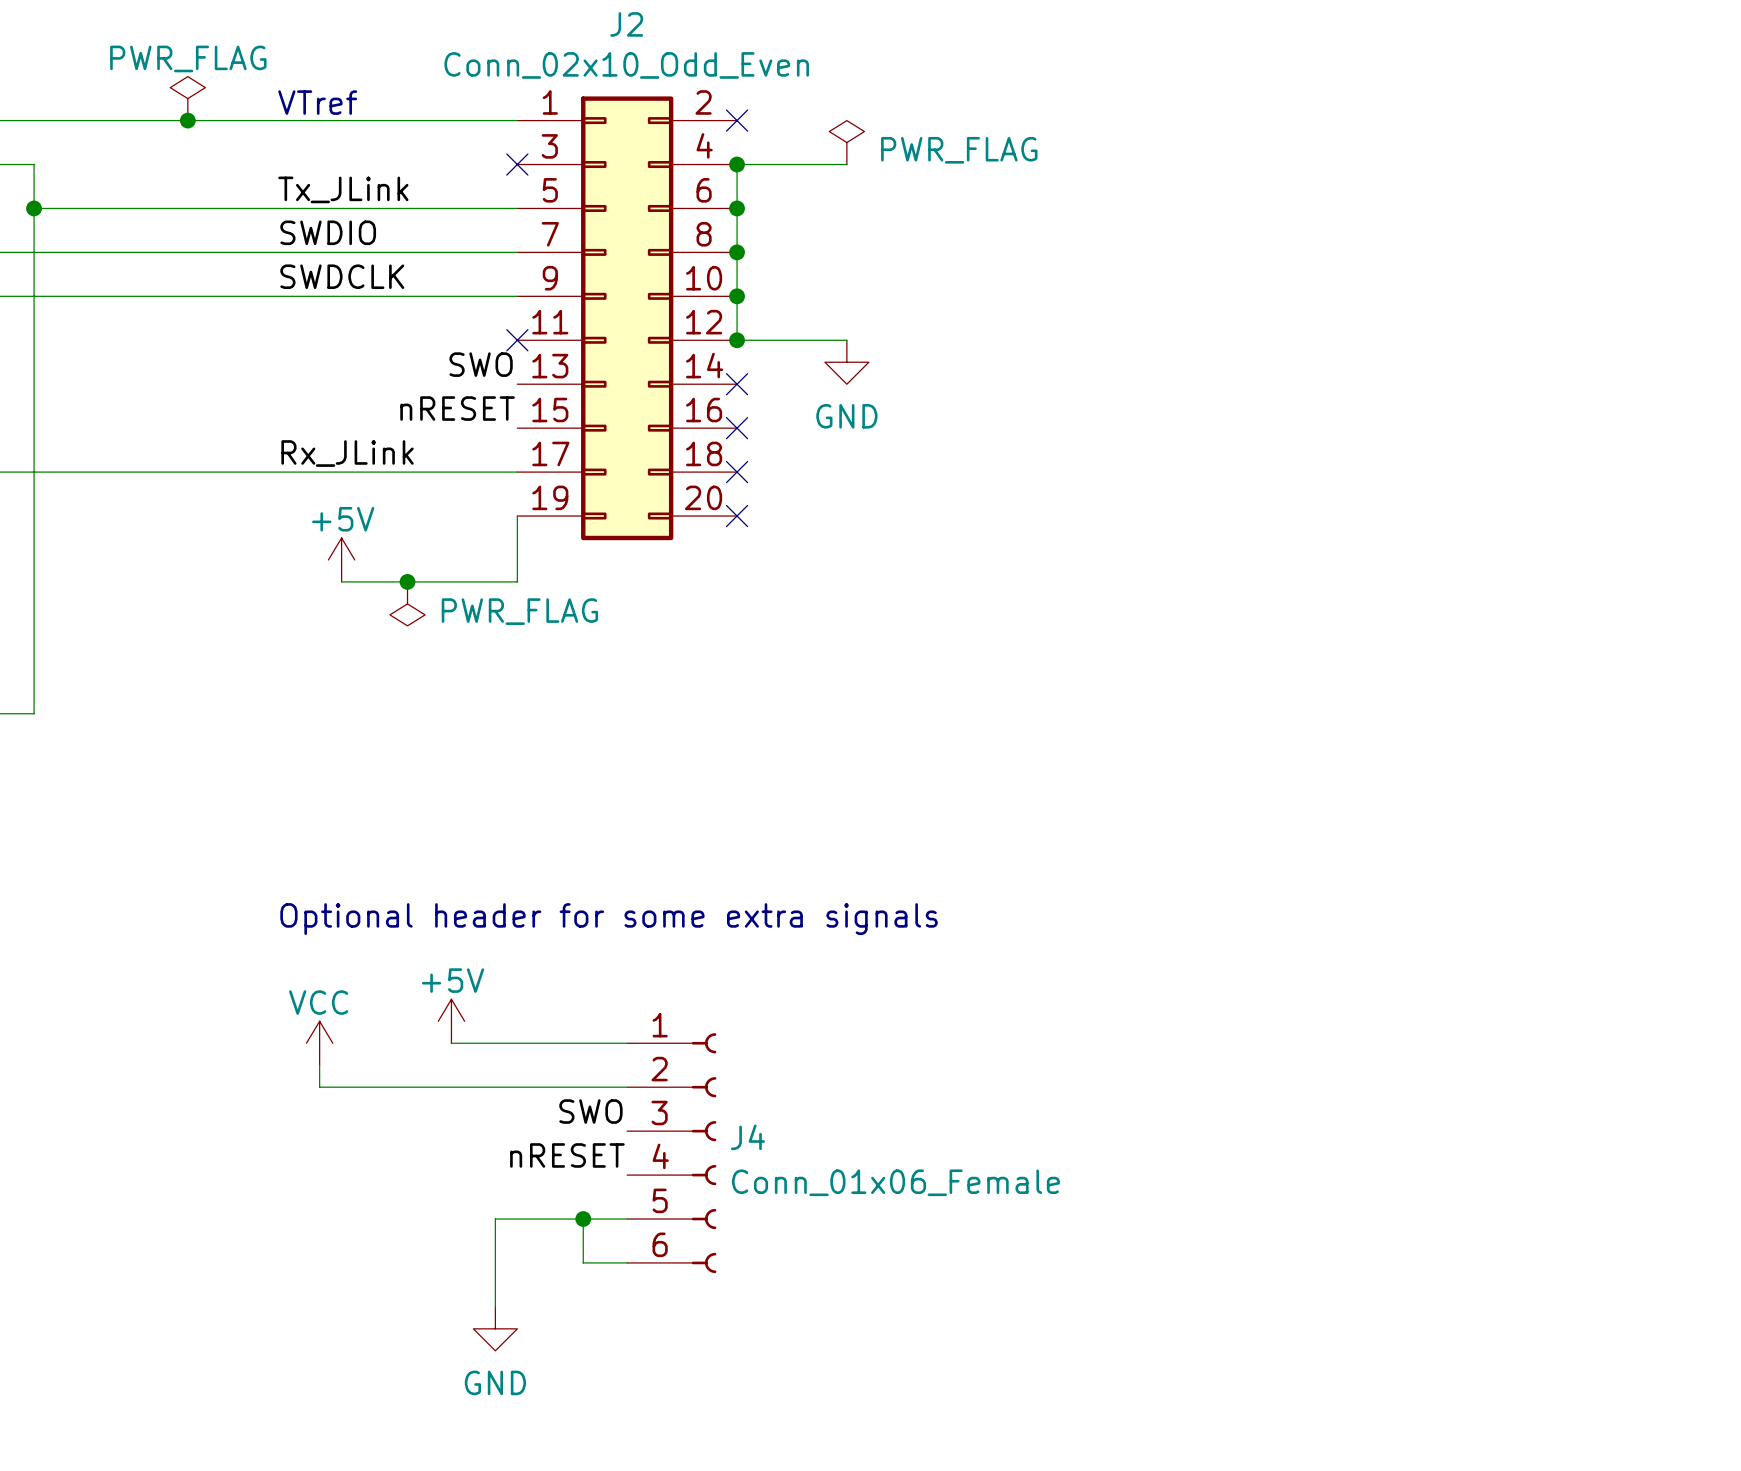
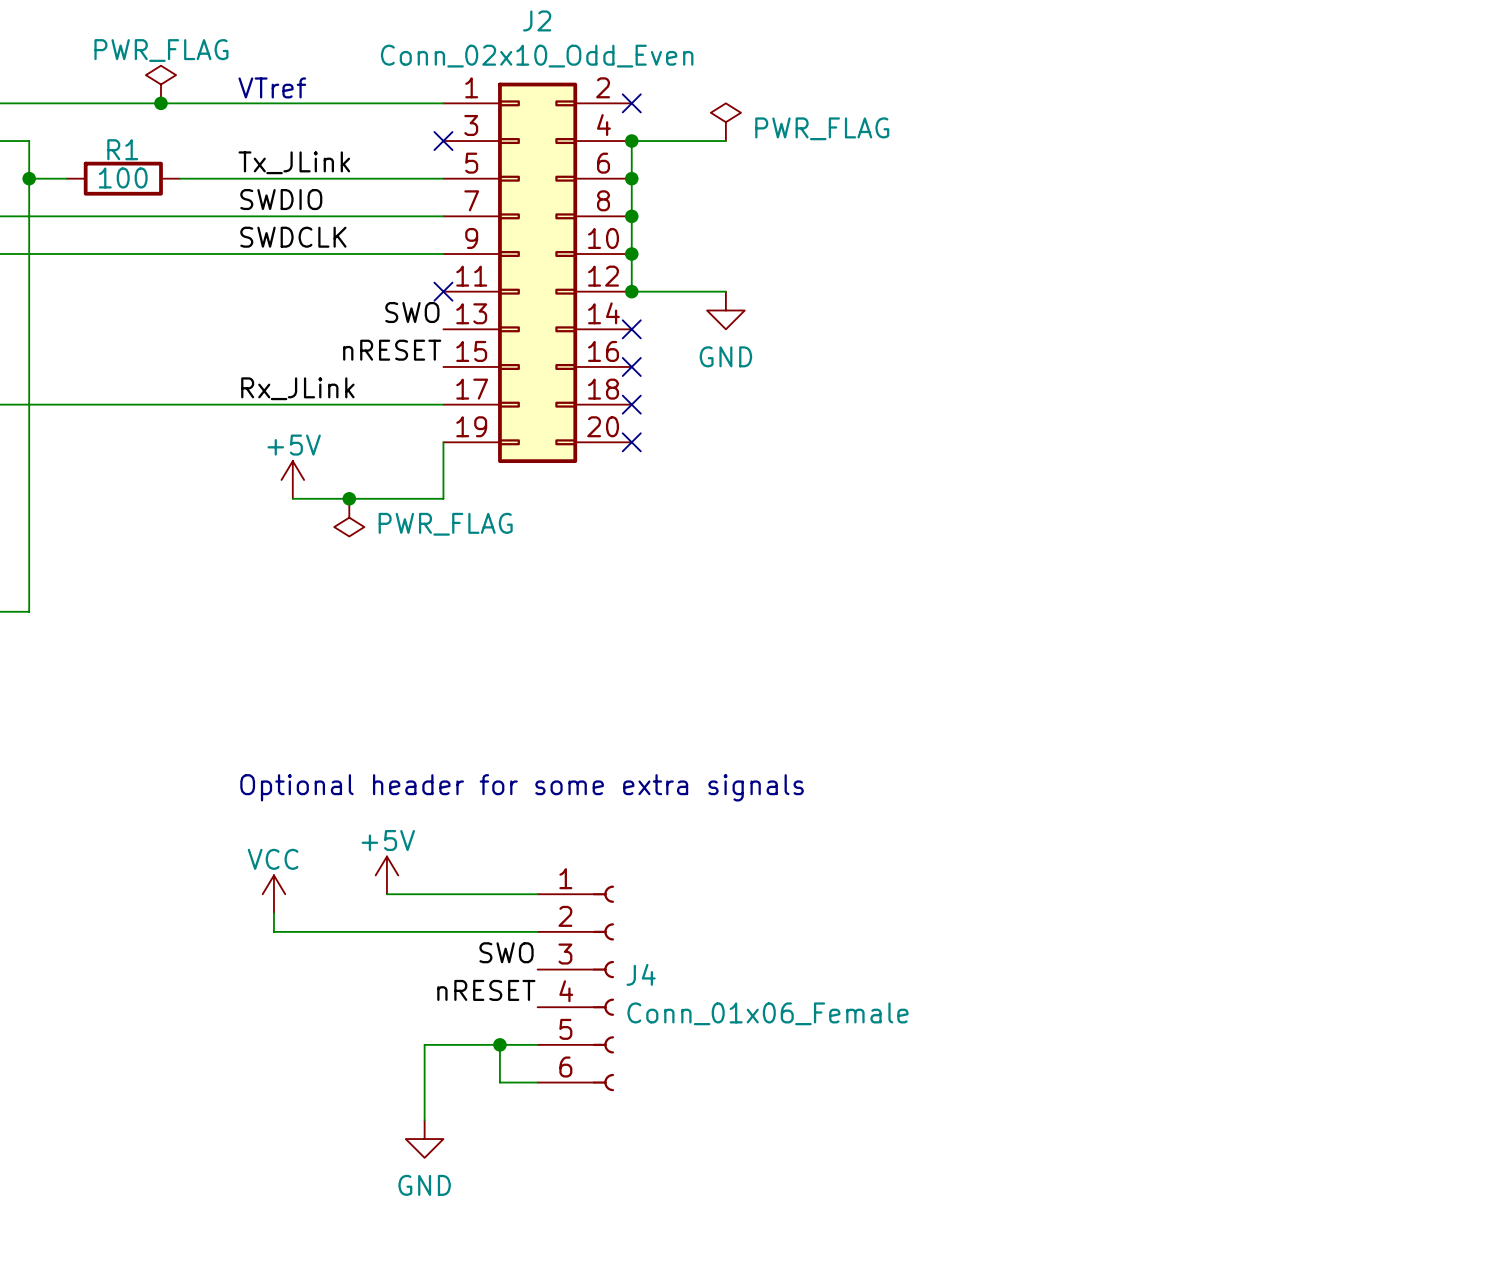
wire: (77, 208) (209, 208) -> none
R1: none -> 100 (123, 178)

